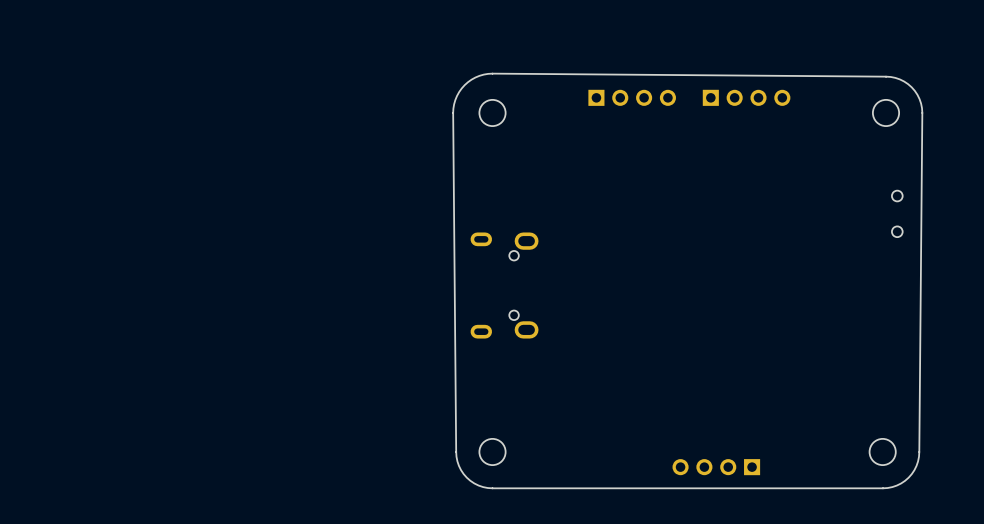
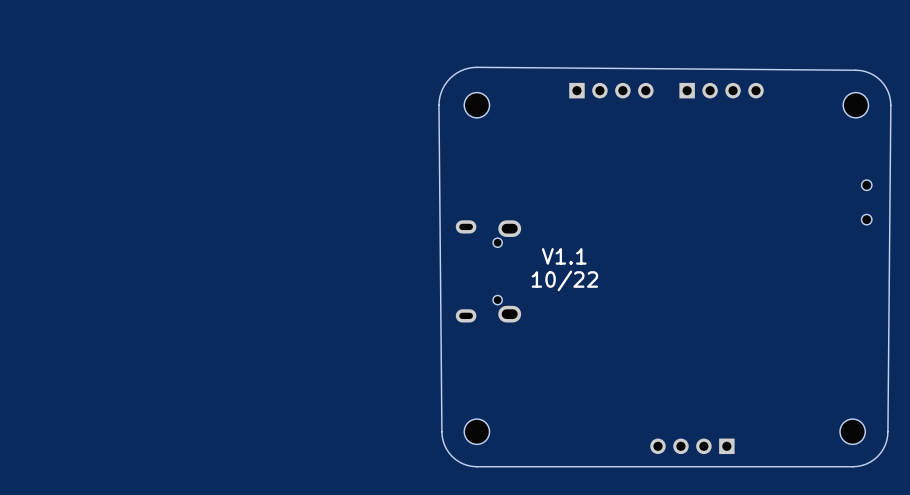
text: none -> V1.1 (564, 256)
text: none -> 10/22 (564, 280)

